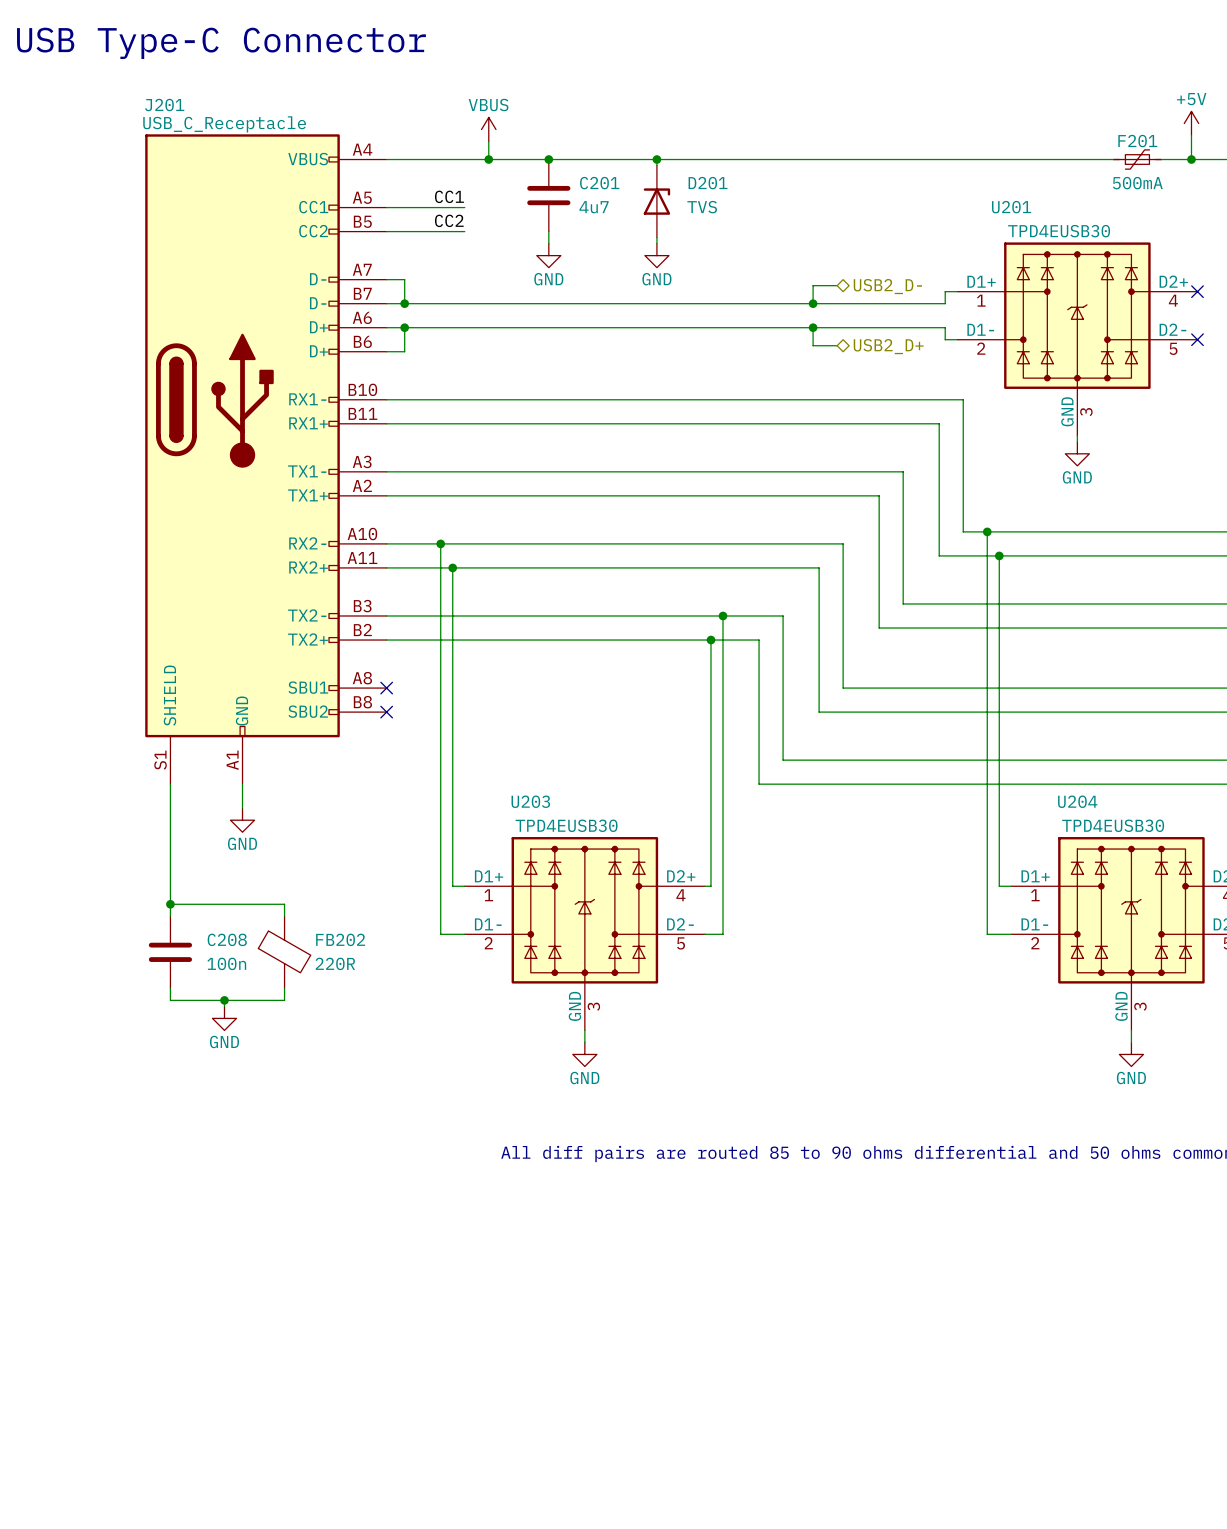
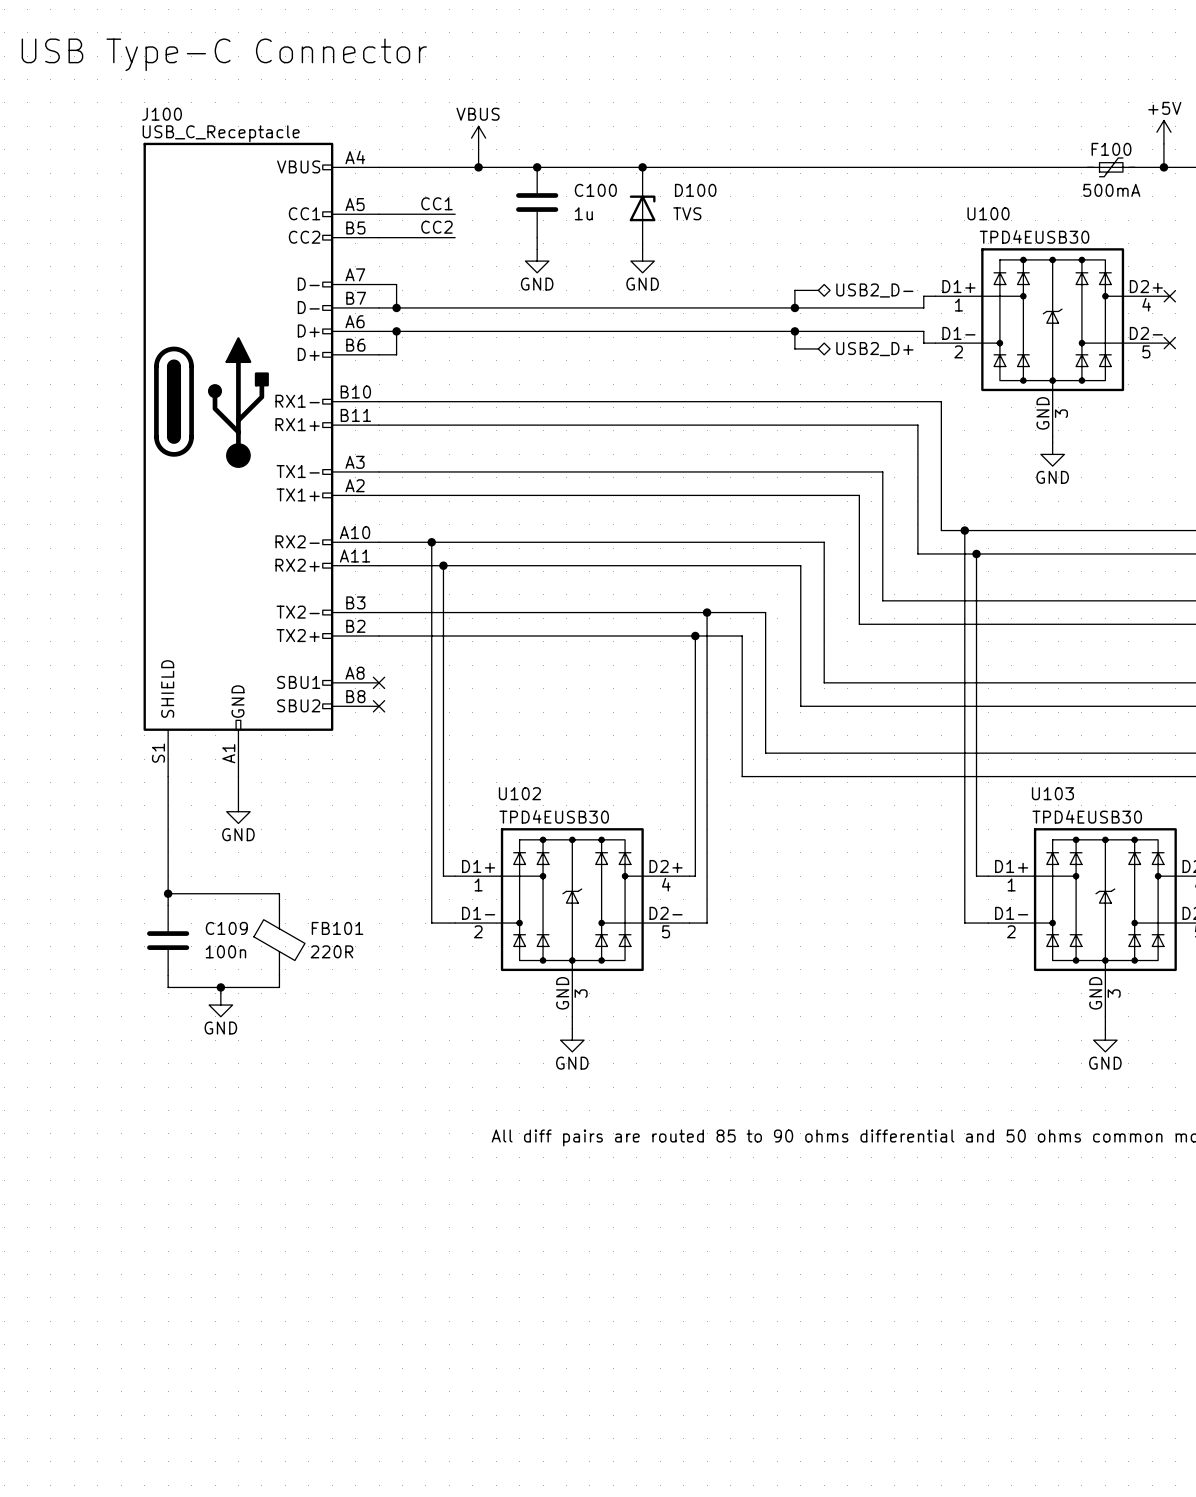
J201 name: J201 (164, 105) -> J100 (162, 114)
F201 name: F201 (1137, 141) -> F100 (1111, 149)
C201 name: C201 (599, 183) -> C100 (595, 190)
D201 name: D201 (708, 183) -> D100 (695, 190)
C201 value: 4u7 (594, 207) -> 1u (583, 213)
U201 name: U201 (1011, 207) -> U100 (988, 213)
U203 name: U203 (530, 801) -> U102 (519, 793)
U204 name: U204 (1077, 801) -> U103 (1052, 793)
C208 name: C208 (227, 939) -> C109 (226, 928)
FB202 name: FB202 (340, 939) -> FB101 (337, 928)

